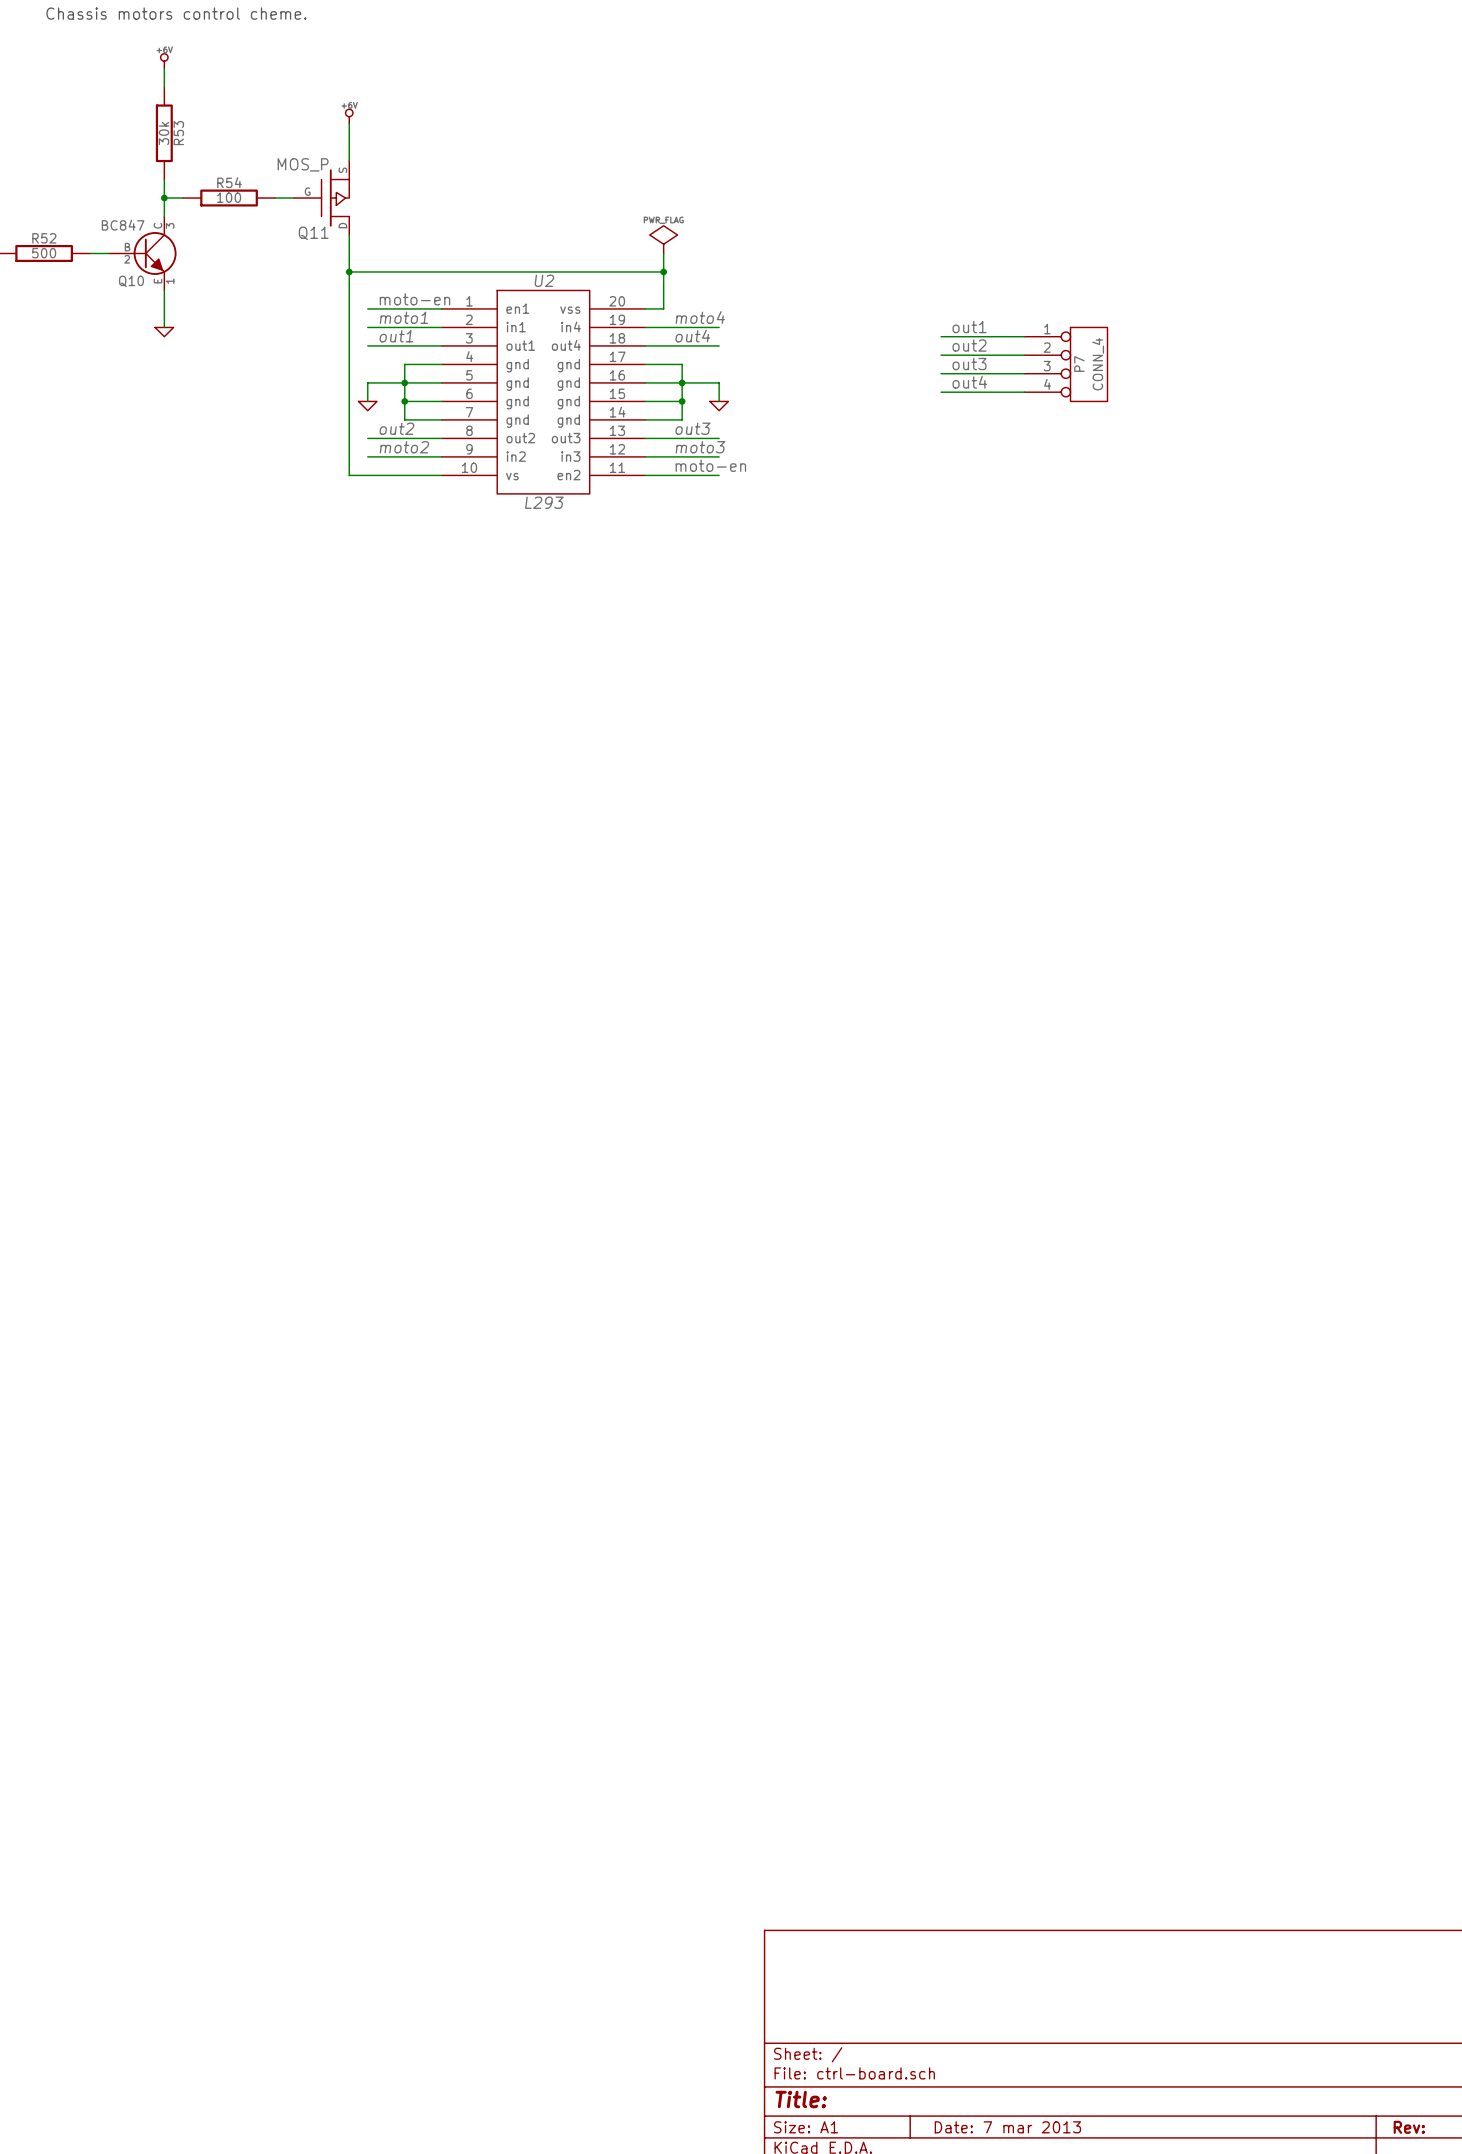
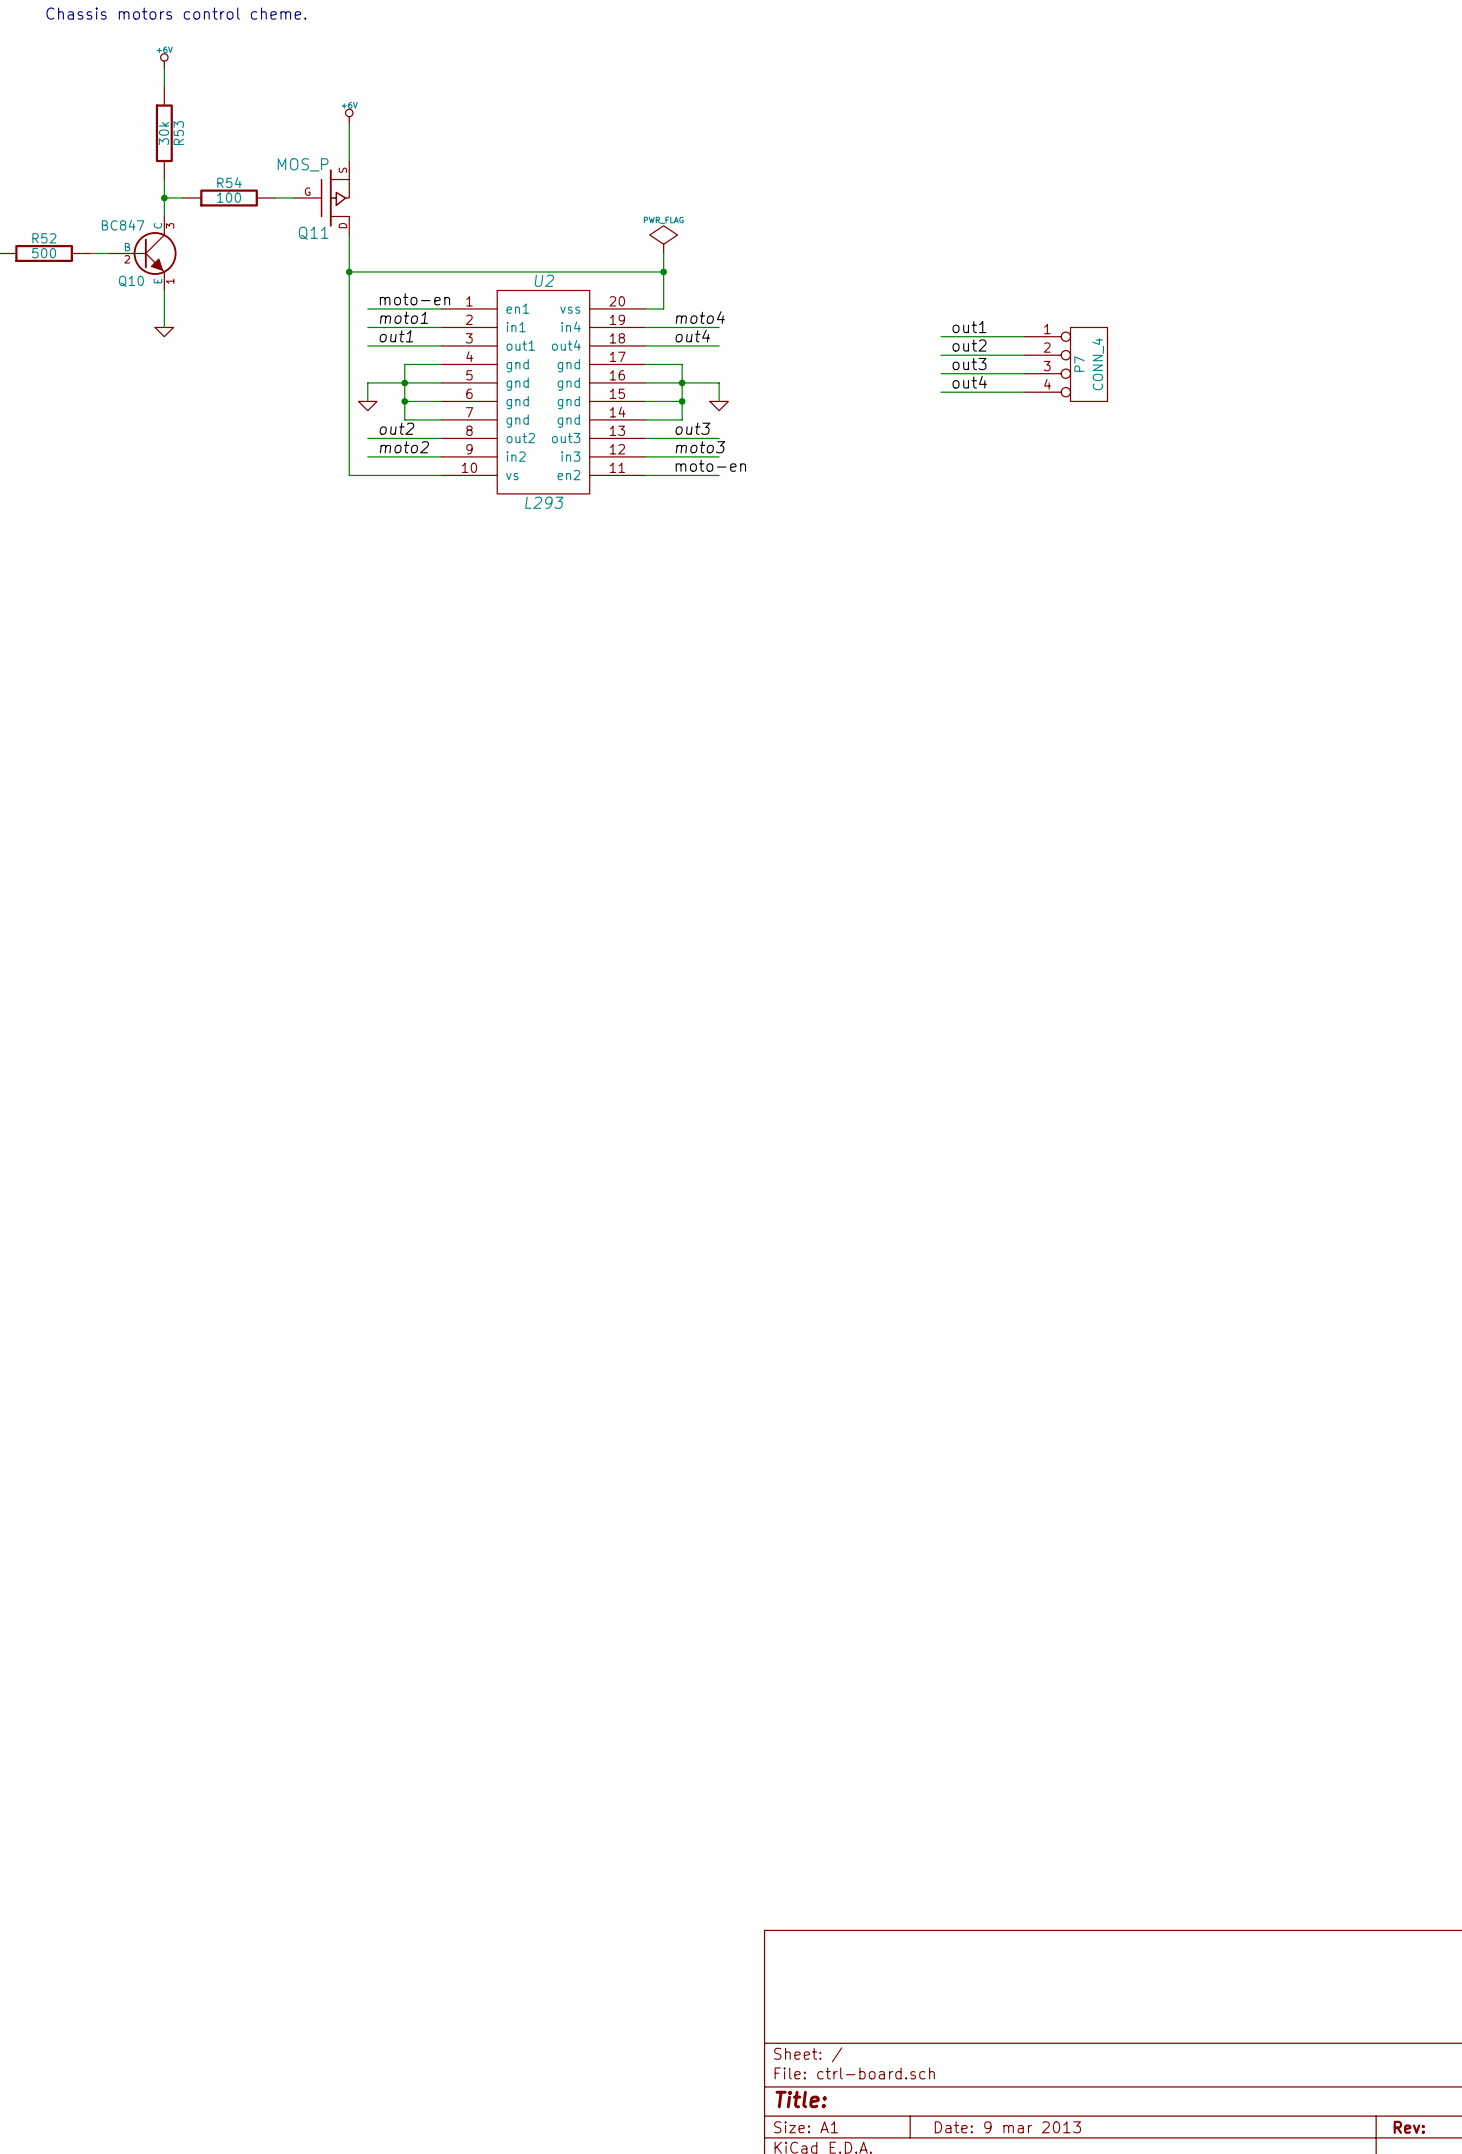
title block: Date: 7 mar 2013 (1007, 2127) -> Date: 9 mar 2013 (1007, 2127)

